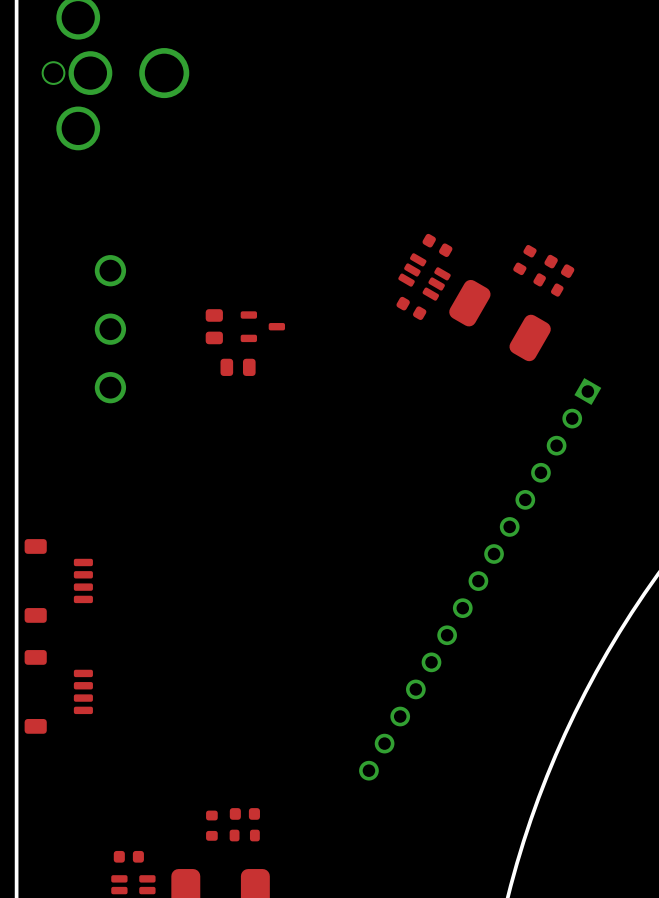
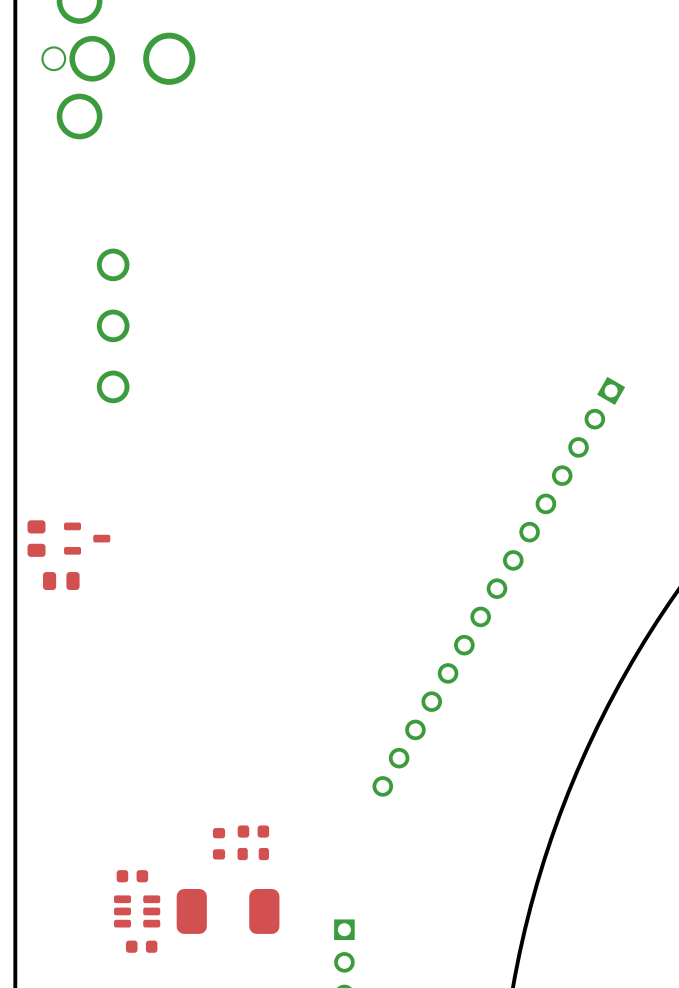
part: (437, 245) -> none
part: (524, 260) -> none
part: (559, 266) -> none
part: (424, 276) -> none
part: (548, 284) -> none
part: (411, 308) -> none
part: (500, 320) -> none
part: (214, 326) -> none
part position: (262, 326) -> (87, 538)
part: (238, 367) -> none
part: none -> (36, 538)
part footprint: [24, 539, 93, 623] -> [42, 572, 80, 591]
part: (58, 691) -> none

